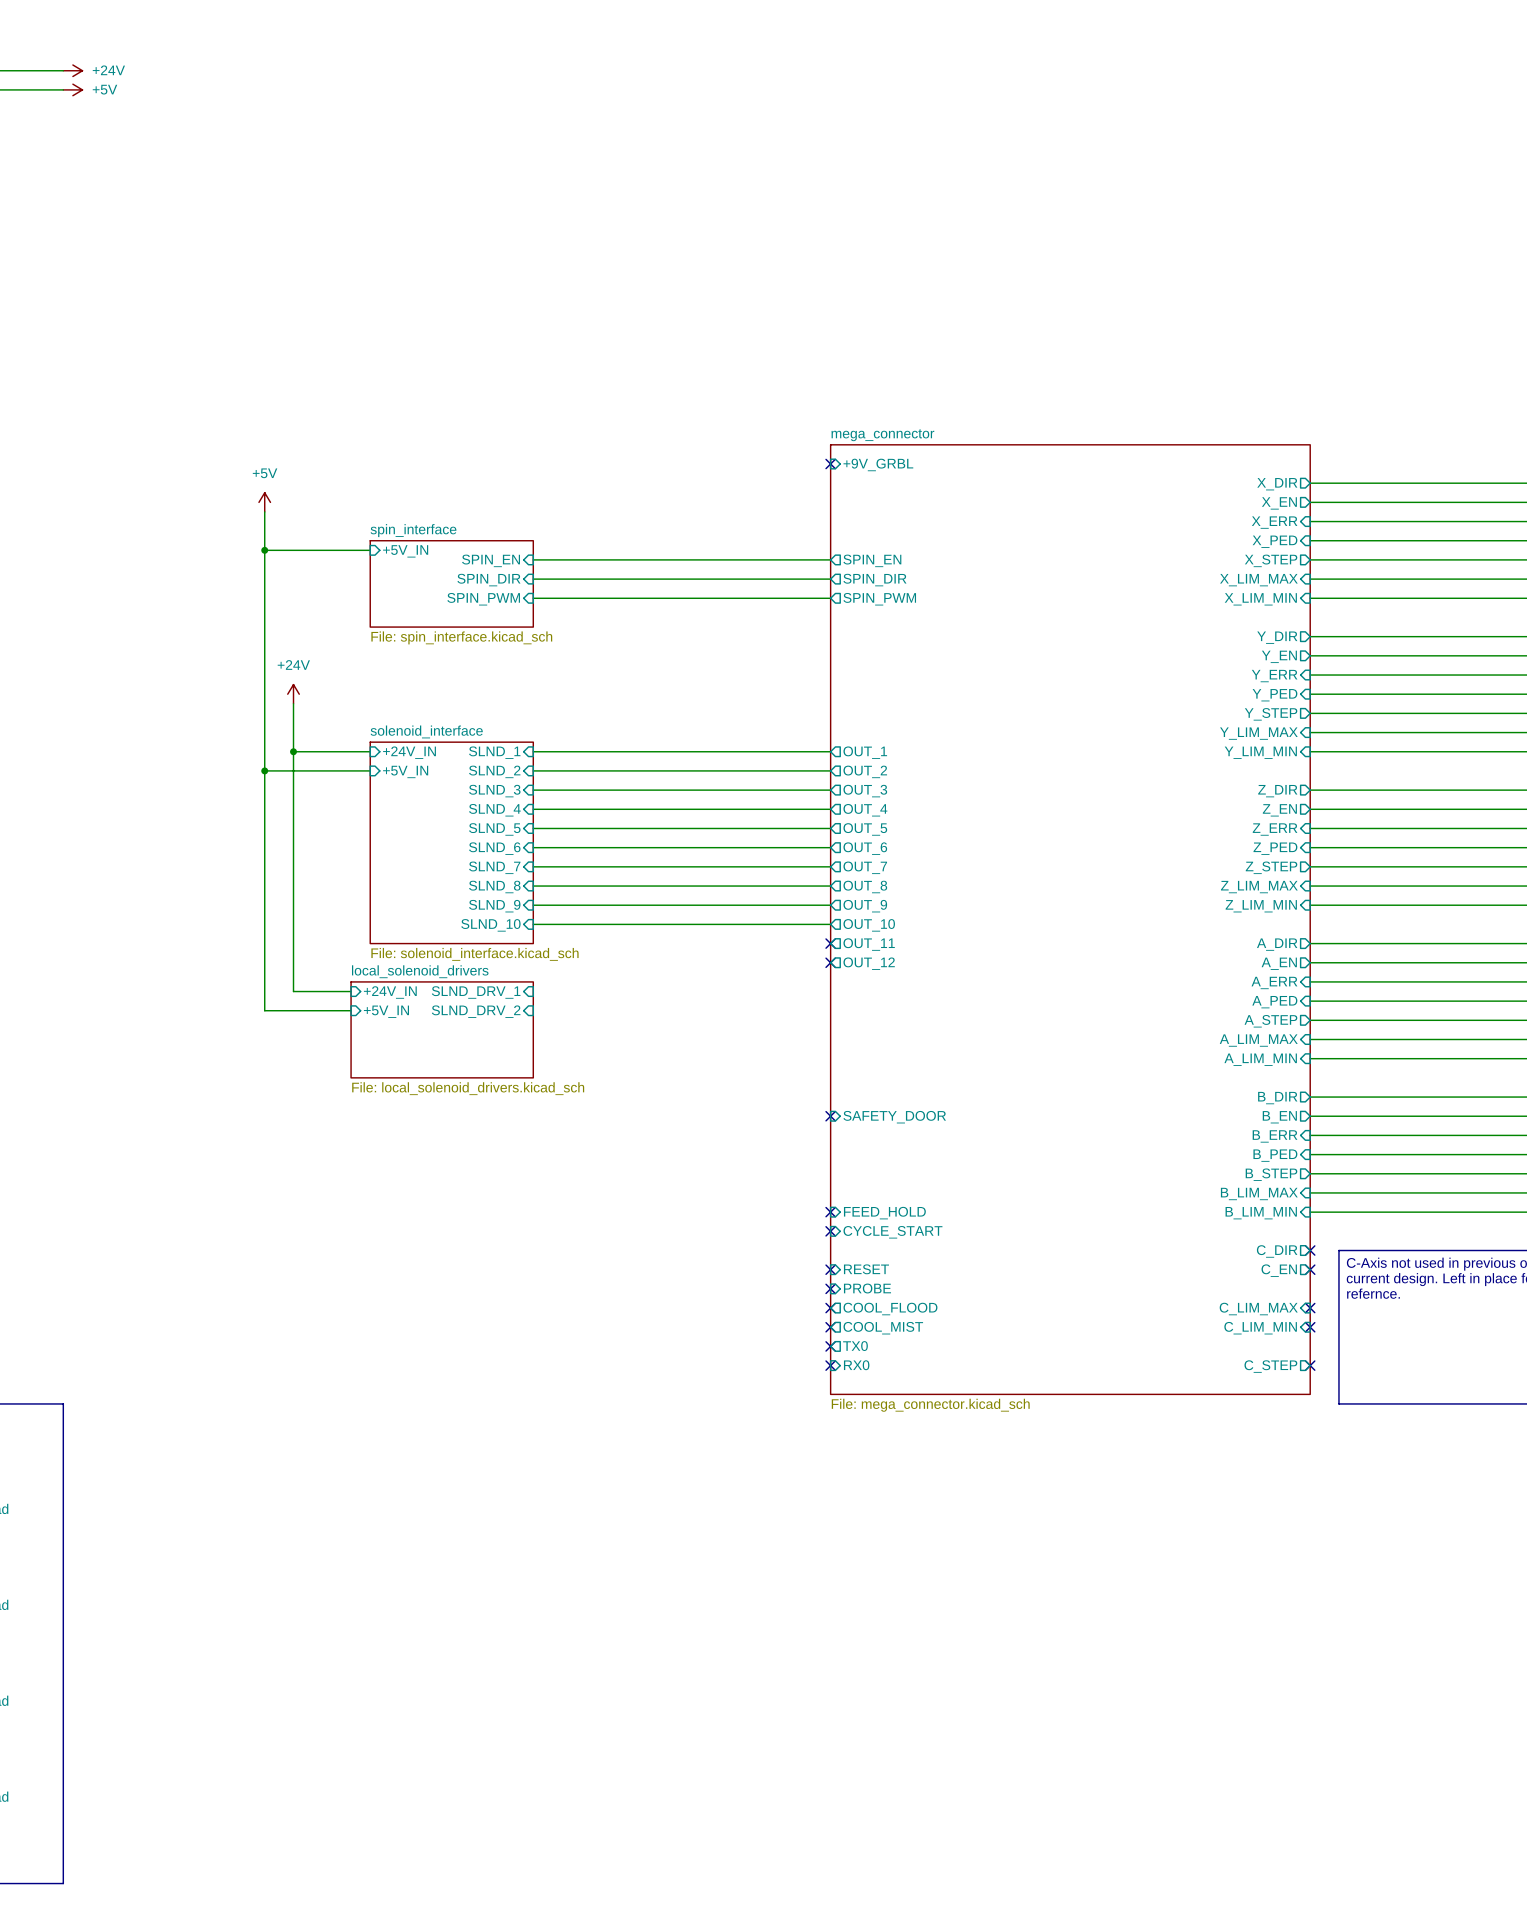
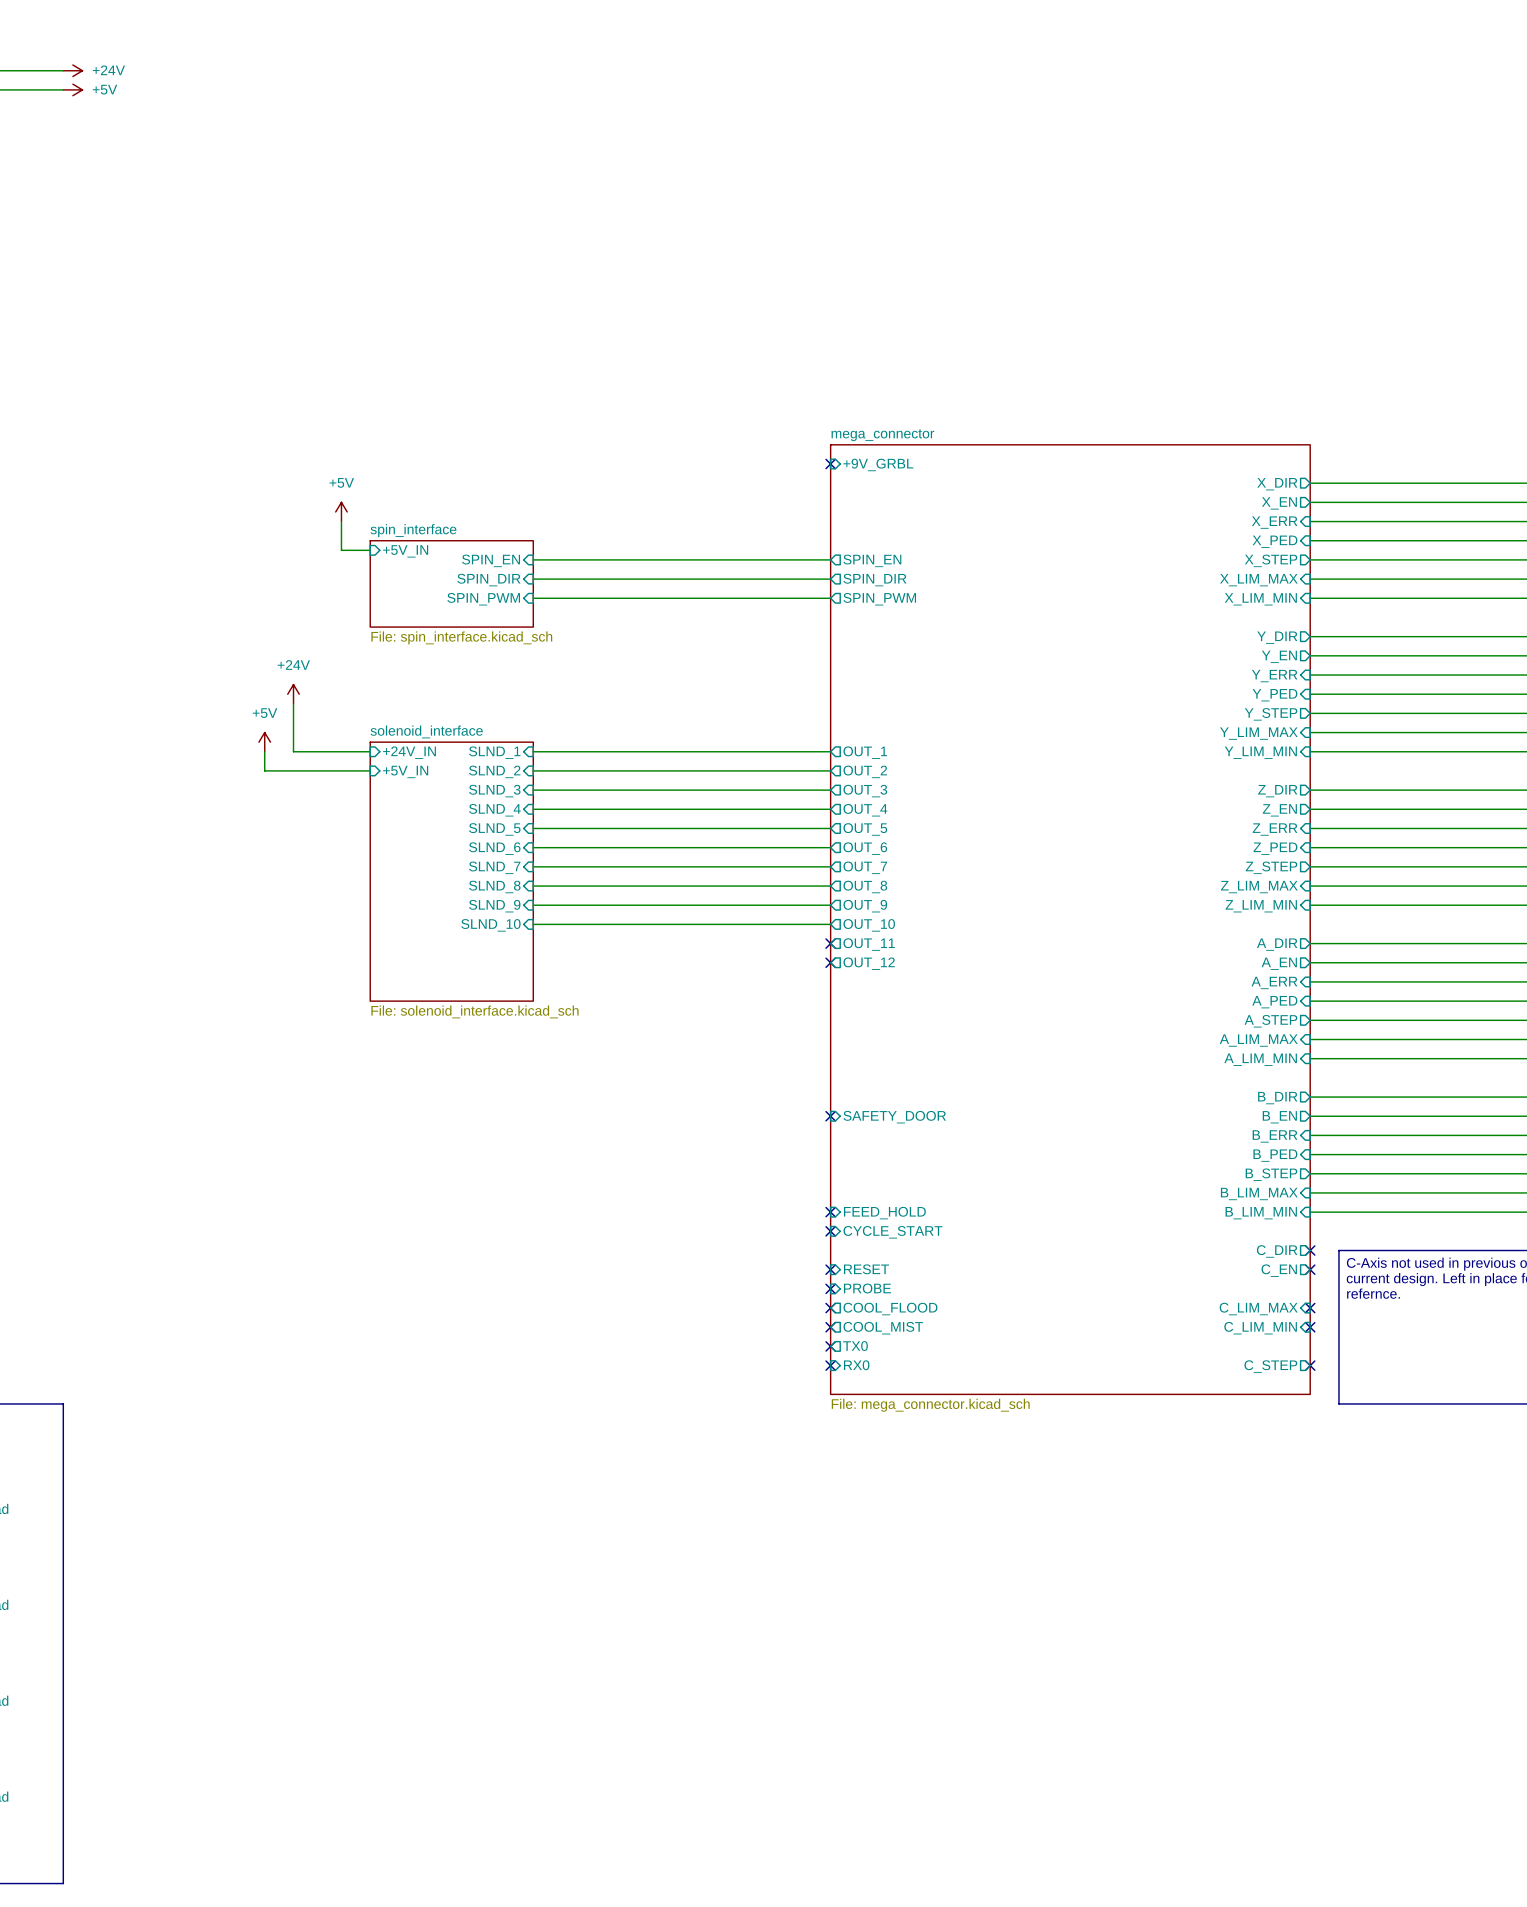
power symbol position: +5V (264, 502) -> +5V (341, 511)
wire: (264, 511) (264, 751) -> none
wire: (264, 550) (341, 550) -> (341, 521) (341, 550)
junction: (264, 550) -> none
power symbol: none -> +5V (264, 742)
wire: (293, 751) (293, 991) (351, 991) -> none
junction: (293, 751) -> none
wire: (264, 770) (264, 1010) (351, 1010) -> none
junction: (264, 770) -> none
sheet solenoid_interface: File: solenoid_interface.kicad_sch (451, 842) -> none
sheet solenoid_interface: none -> File: solenoid_interface.kicad_sch (451, 871)
sheet pin: +24V_IN (390, 992) -> none
sheet pin: SLND_DRV_1 (476, 992) -> none
sheet pin: +5V_IN (386, 1011) -> none
sheet pin: SLND_DRV_2 (476, 1011) -> none
sheet local_solenoid_drivers: File: local_solenoid_drivers.kicad_sch (442, 1029) -> none

